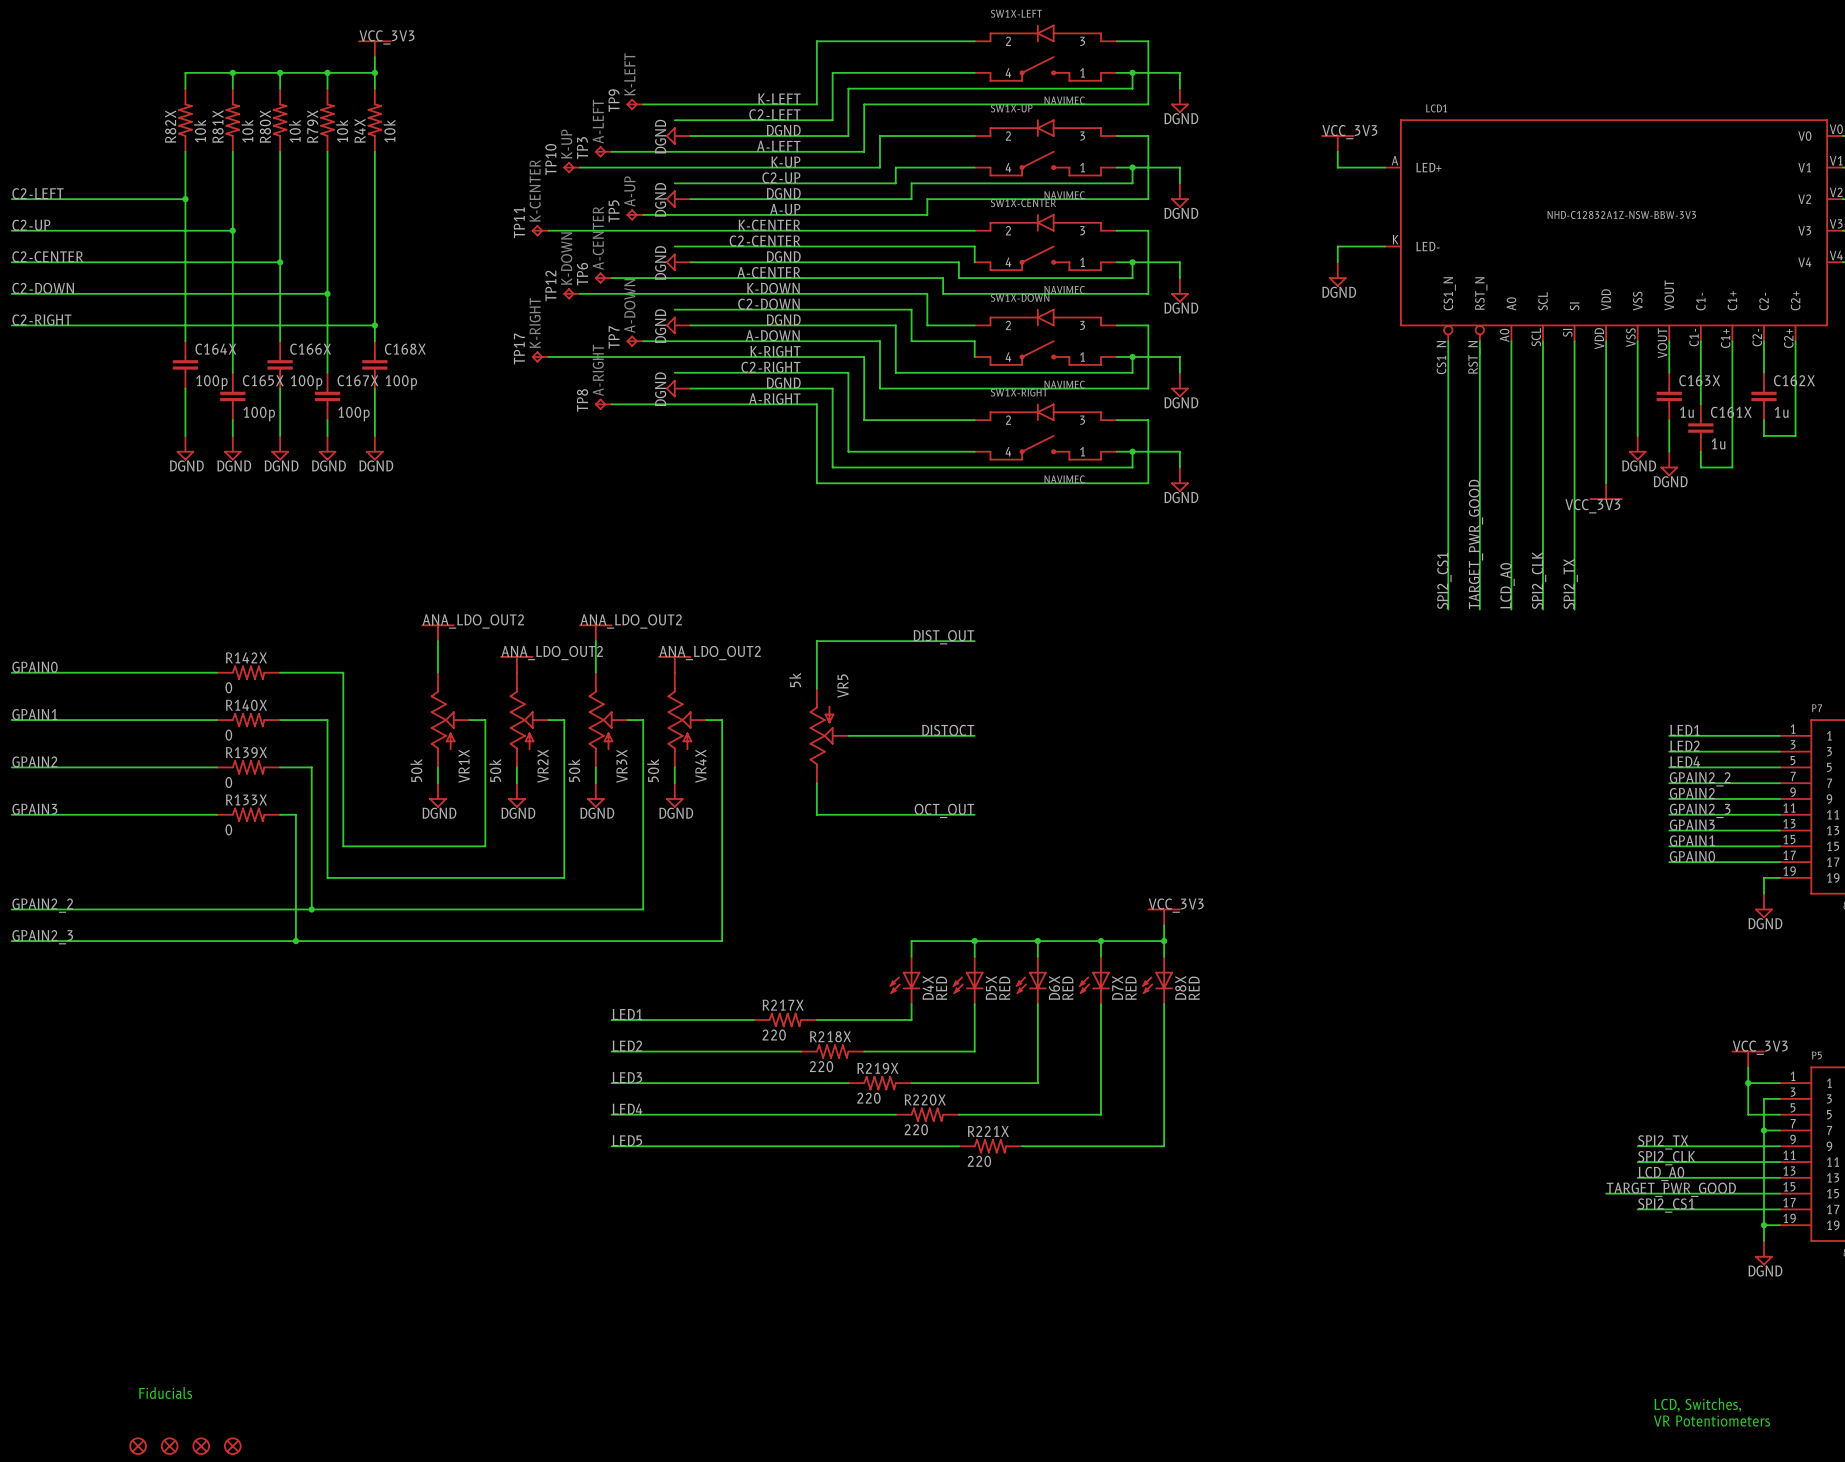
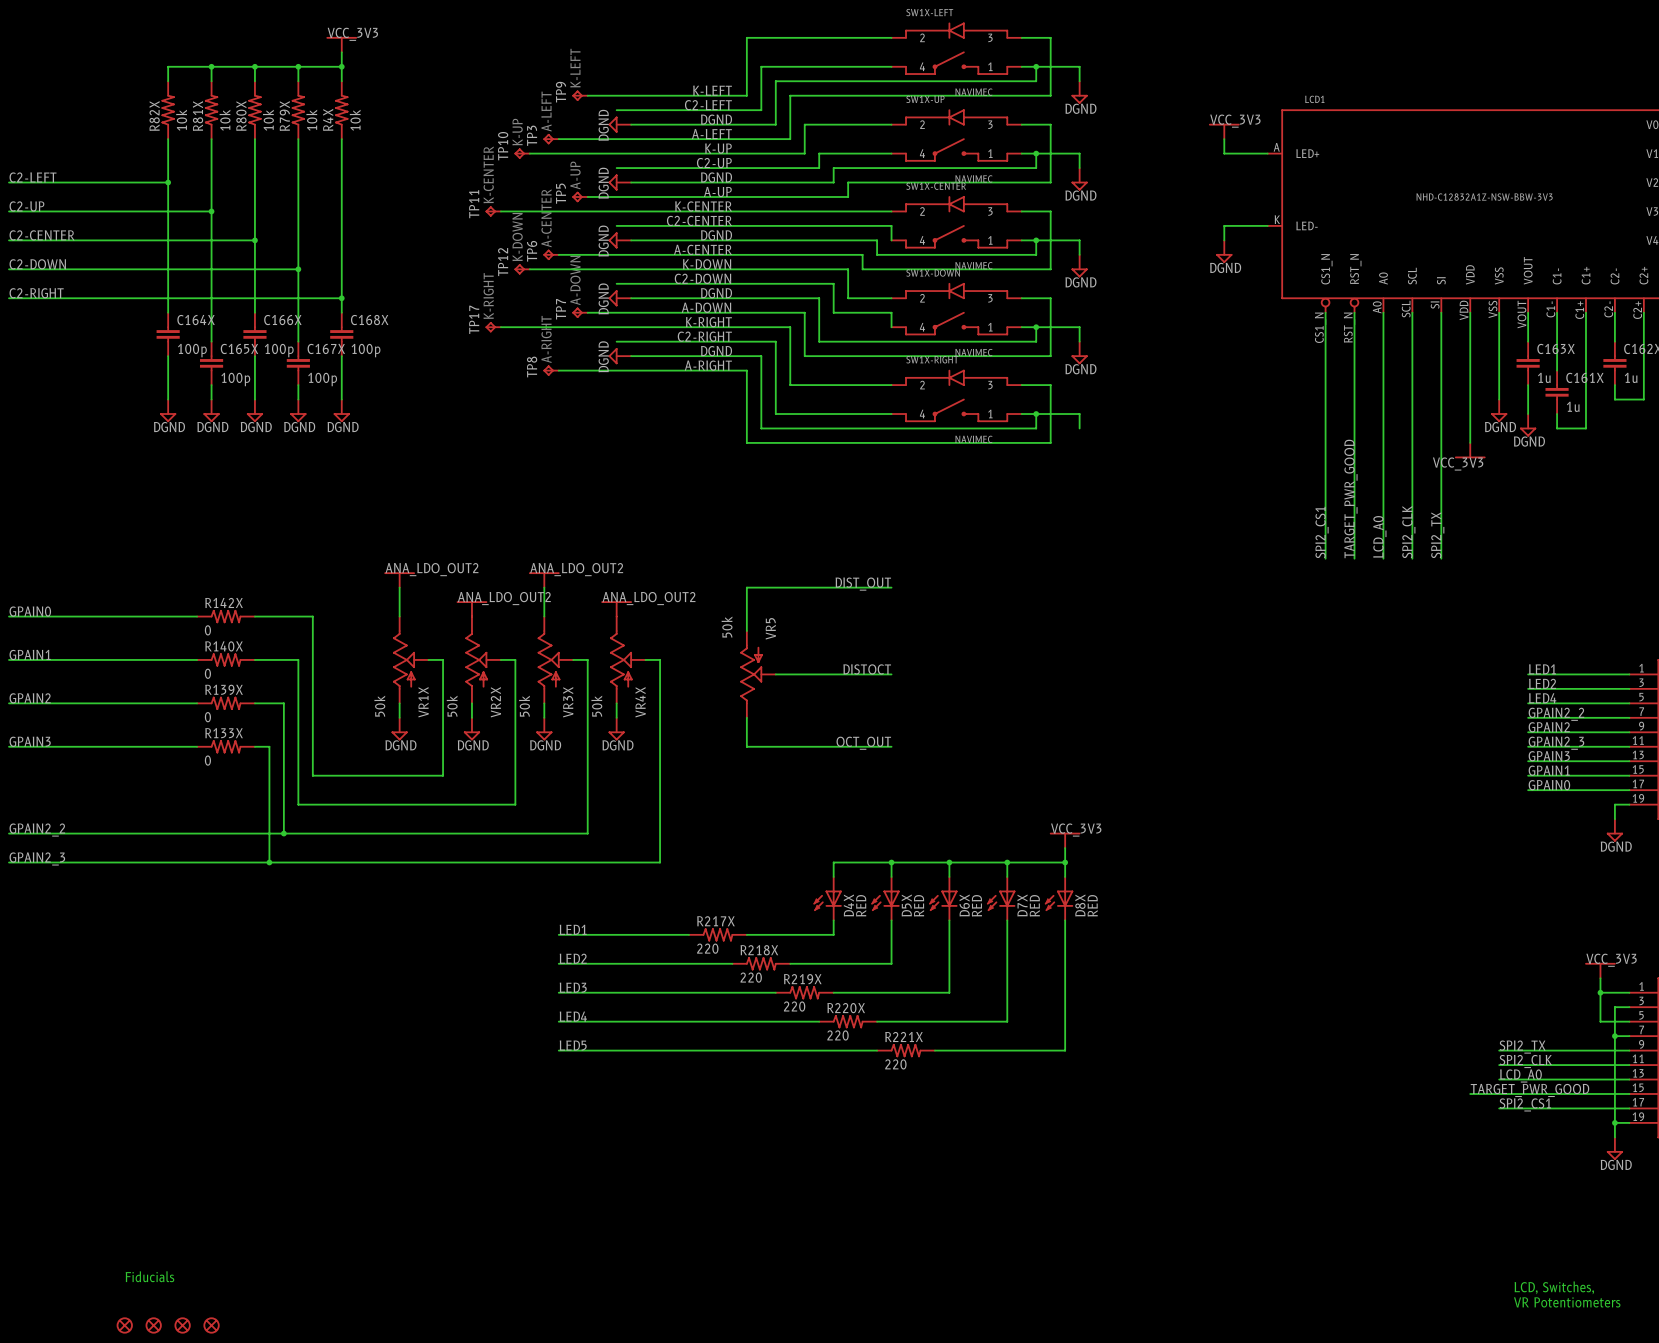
power symbol: DGND (1179, 479) -> none
VR5 value: 5k (795, 679) -> 50k (727, 627)

